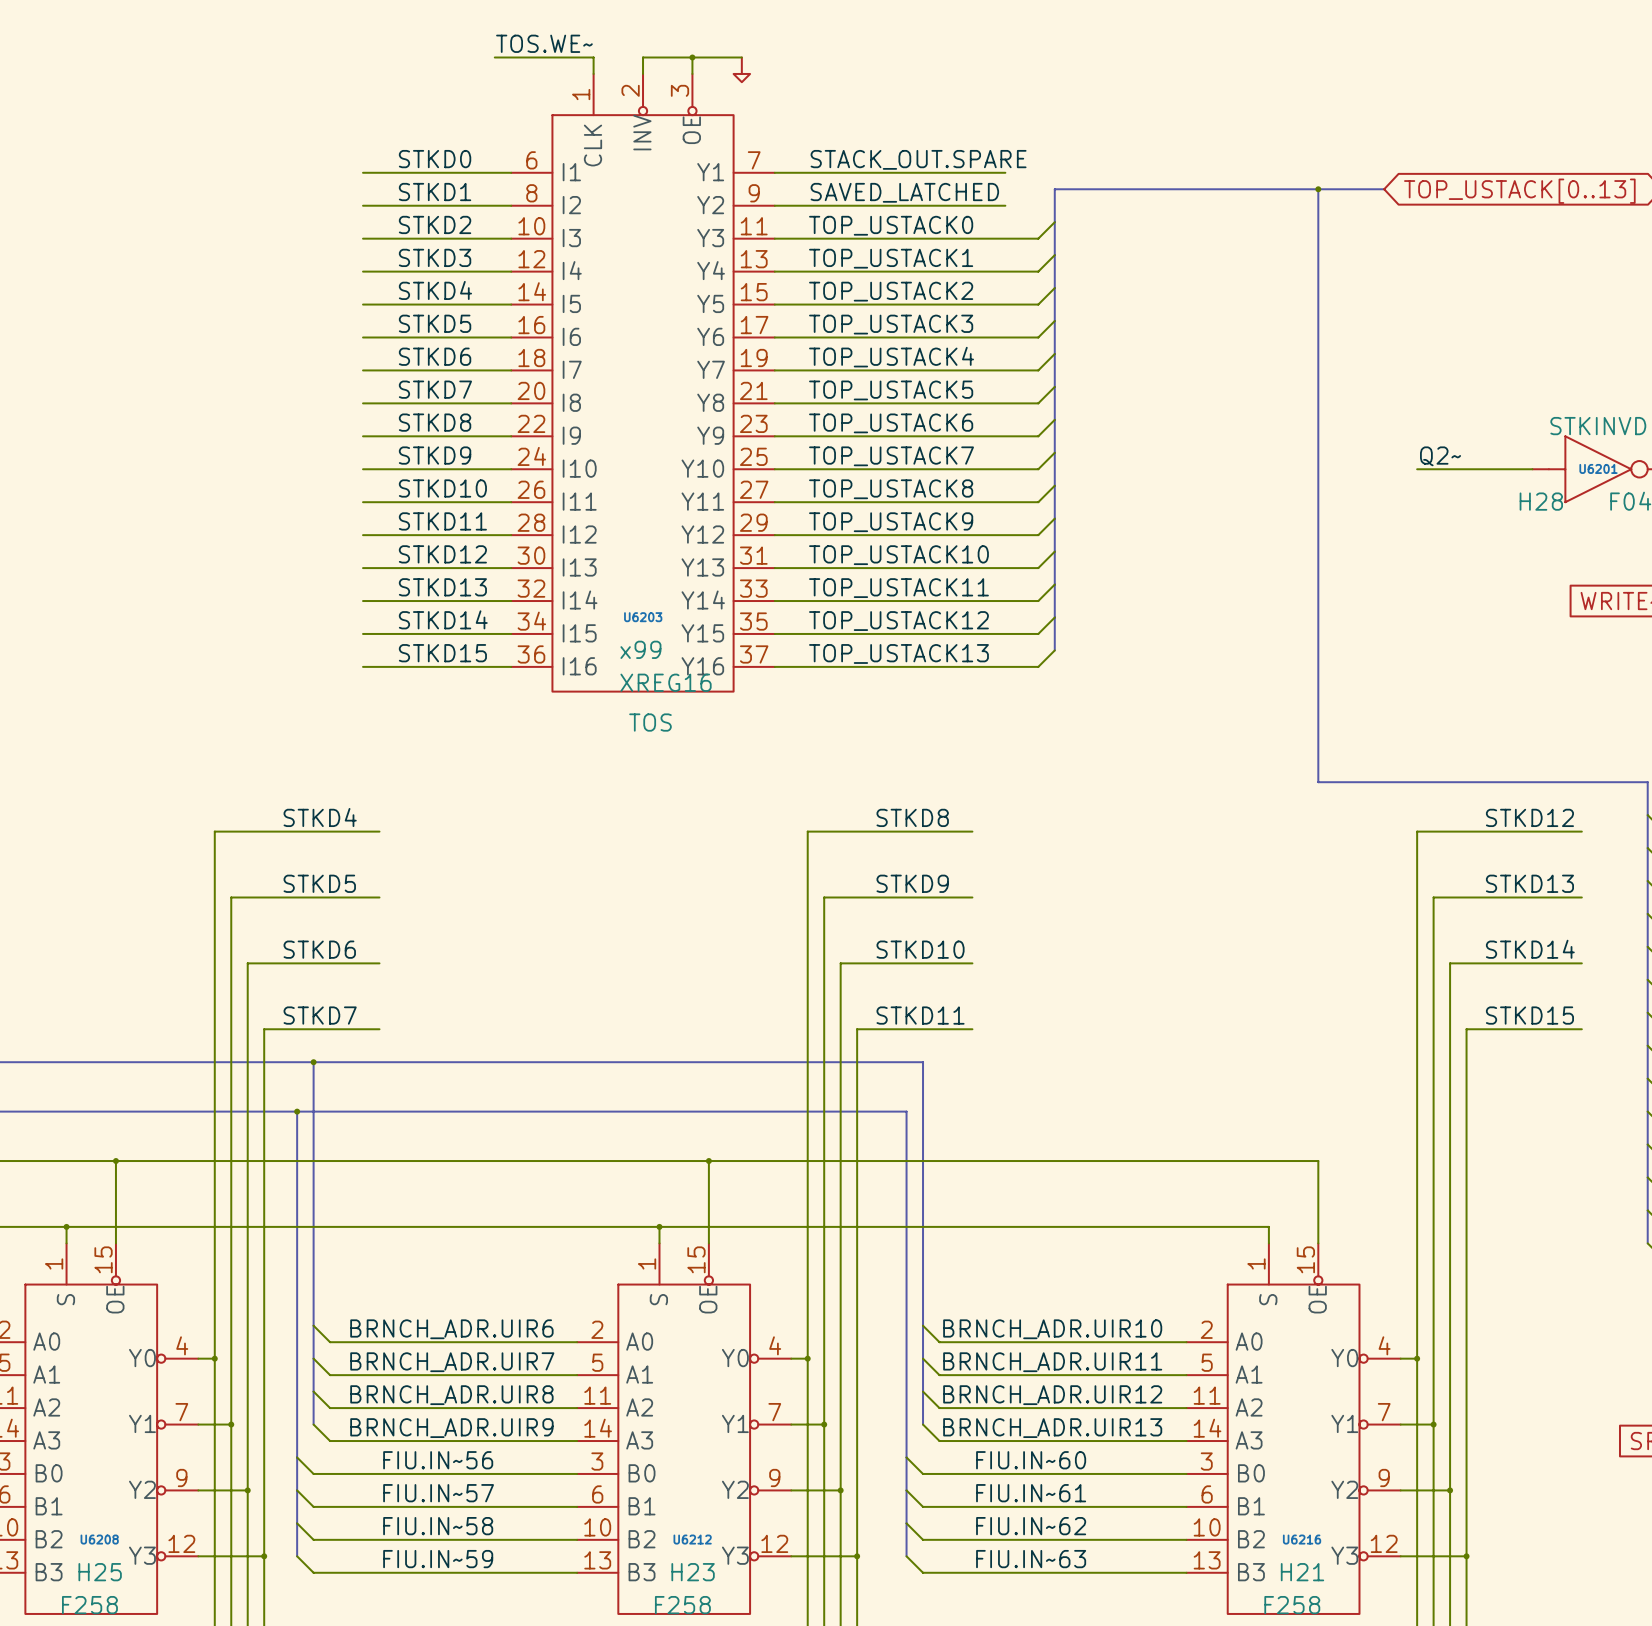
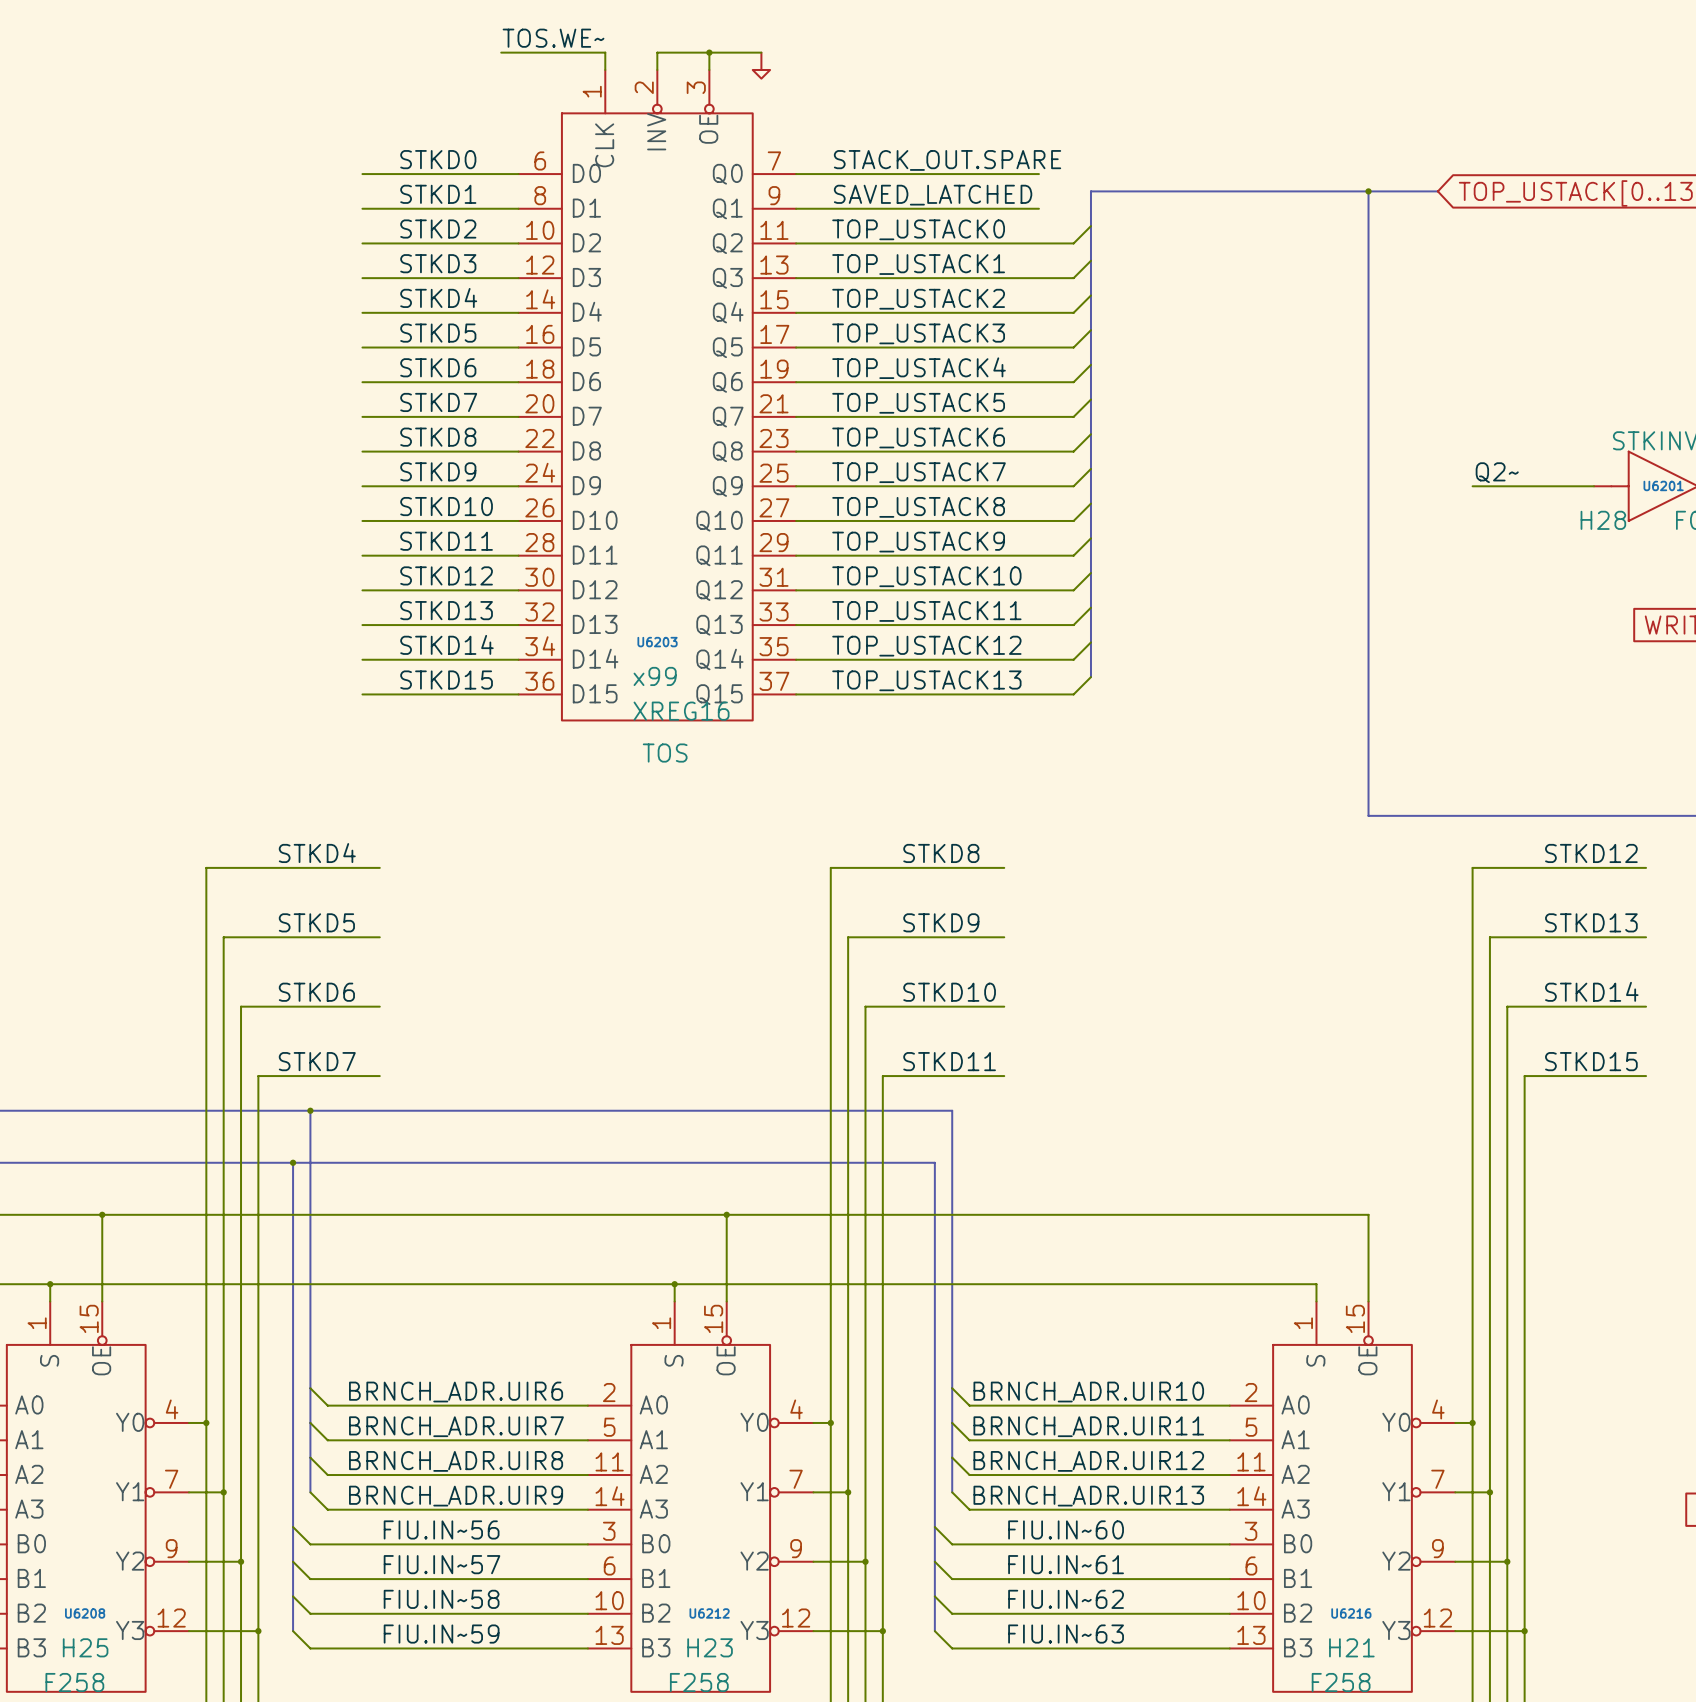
U6203 symbol: [511, 73, 775, 692] -> [518, 69, 797, 721]

